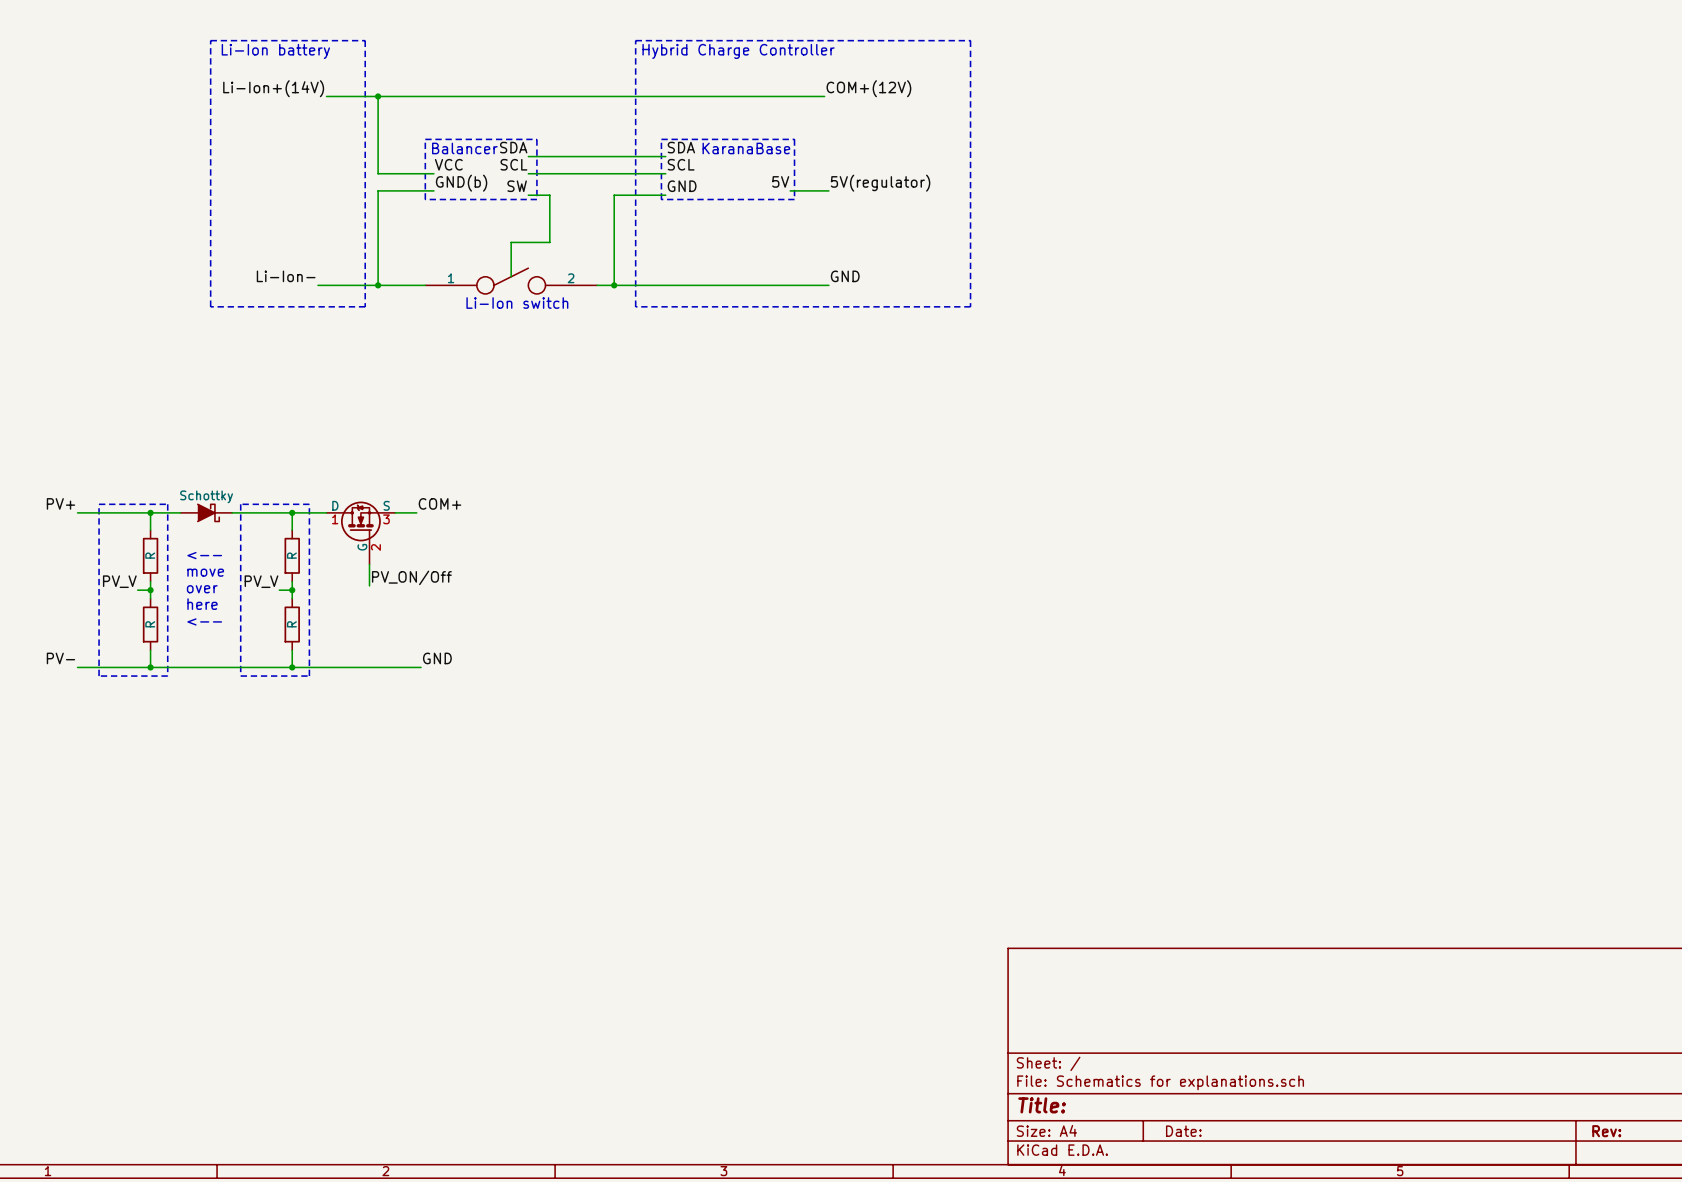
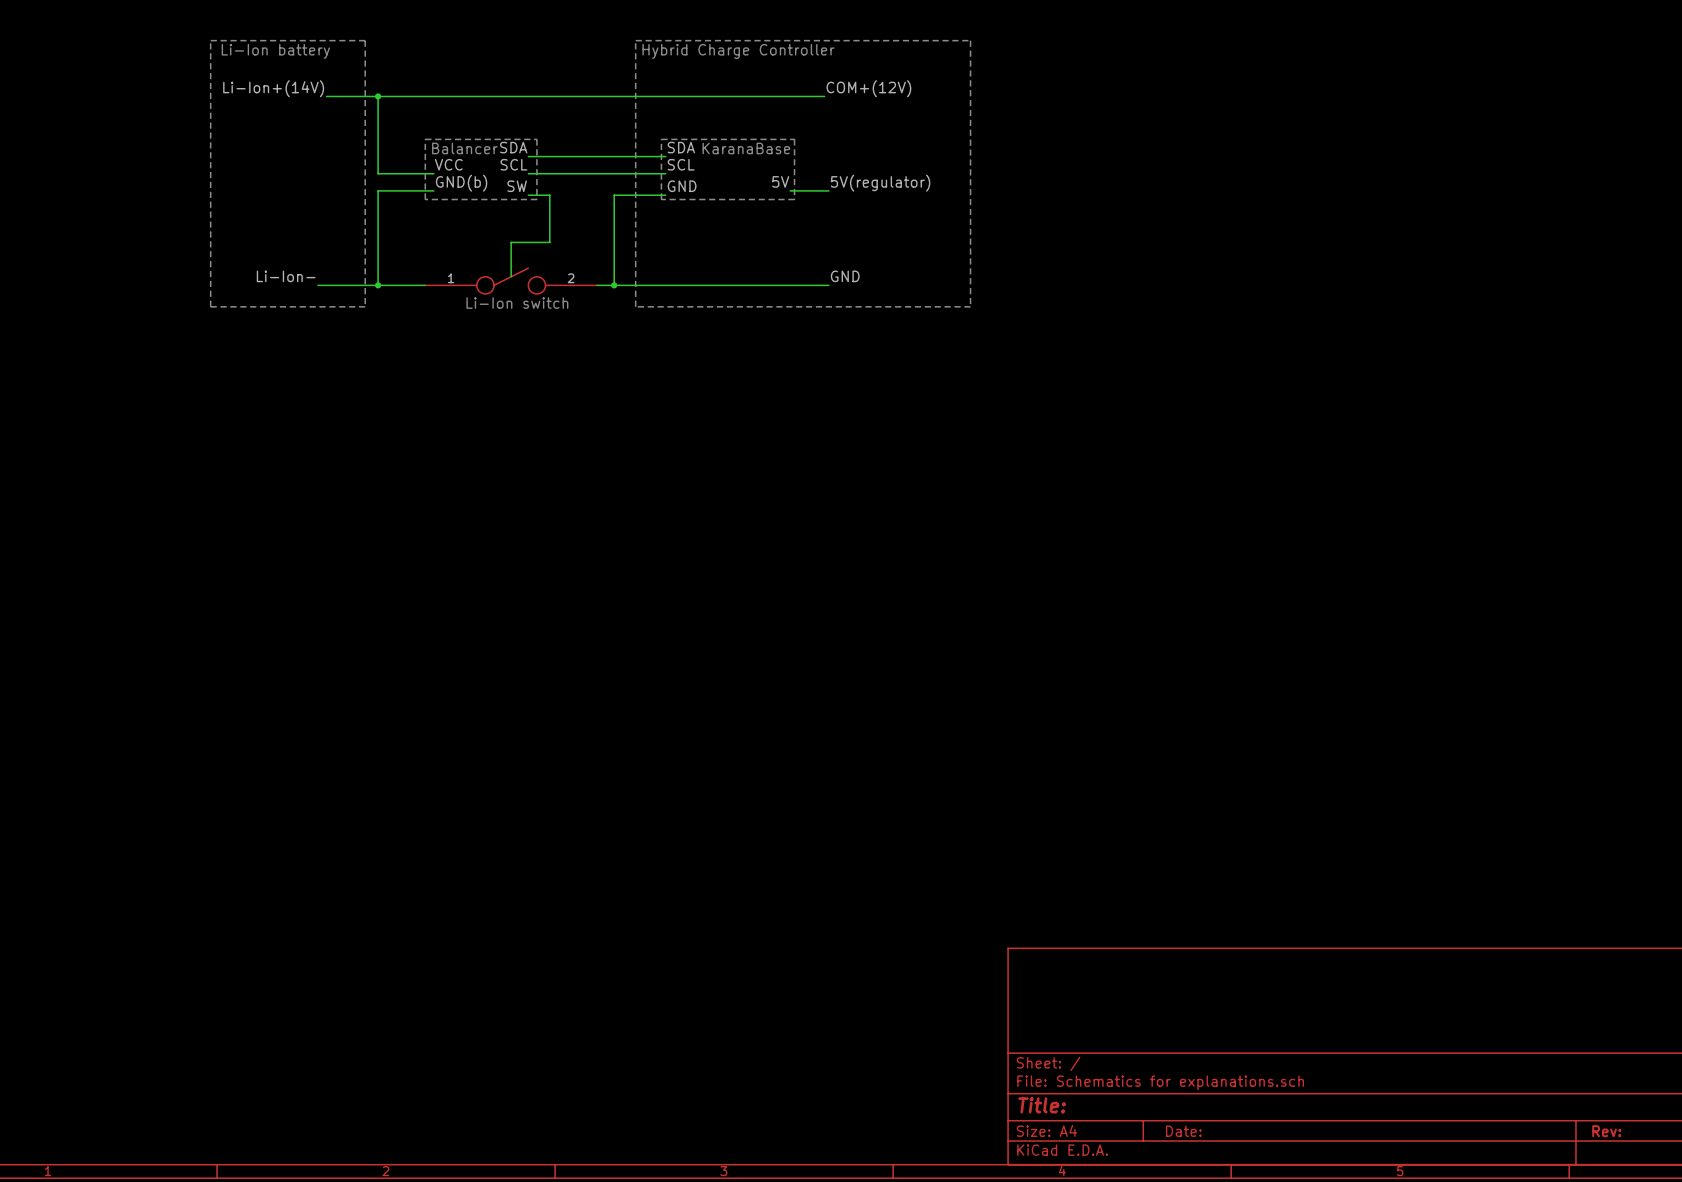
label: PV+ (60, 503) -> none
label: COM+ (439, 503) -> none
line: (99, 504) (99, 676) (167, 676) (167, 504) (99, 504) -> none
line: (240, 504) (309, 504) (309, 676) (240, 676) (240, 504) -> none
wire: (77, 512) (180, 512) -> none
wire: (150, 512) (150, 530) -> none
junction: (150, 512) -> none
part: Schottky (206, 512) -> none
wire: (232, 512) (326, 512) -> none
wire: (292, 512) (292, 530) -> none
junction: (292, 512) -> none
wire: (395, 512) (416, 512) -> none
part: (360, 532) -> none
part: R (150, 555) -> none
text: <-- (204, 555) -> none
part: R (292, 555) -> none
wire: (369, 564) (369, 585) -> none
text: move (205, 572) -> none
label: PV_ON/Off (411, 577) -> none
label: PV_V (119, 581) -> none
wire: (150, 581) (150, 598) -> none
label: PV_V (261, 581) -> none
wire: (292, 581) (292, 598) -> none
text: over (202, 589) -> none
wire: (137, 590) (150, 590) -> none
junction: (150, 590) -> none
wire: (279, 590) (292, 590) -> none
junction: (292, 590) -> none
text: here (202, 604) -> none
text: <-- (204, 621) -> none
part: R (150, 624) -> none
part: R (292, 624) -> none
wire: (150, 650) (150, 667) -> none
wire: (292, 650) (292, 667) -> none
label: PV- (60, 658) -> none
label: GND (437, 658) -> none
wire: (77, 667) (421, 667) -> none
junction: (150, 667) -> none
junction: (292, 667) -> none

